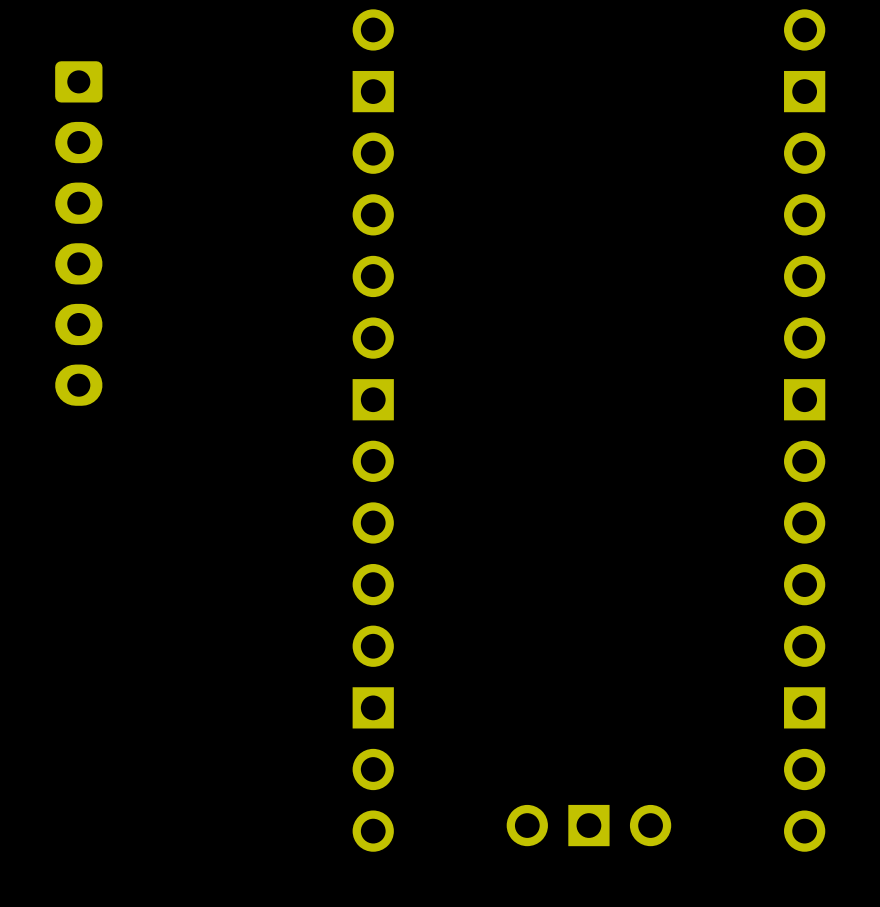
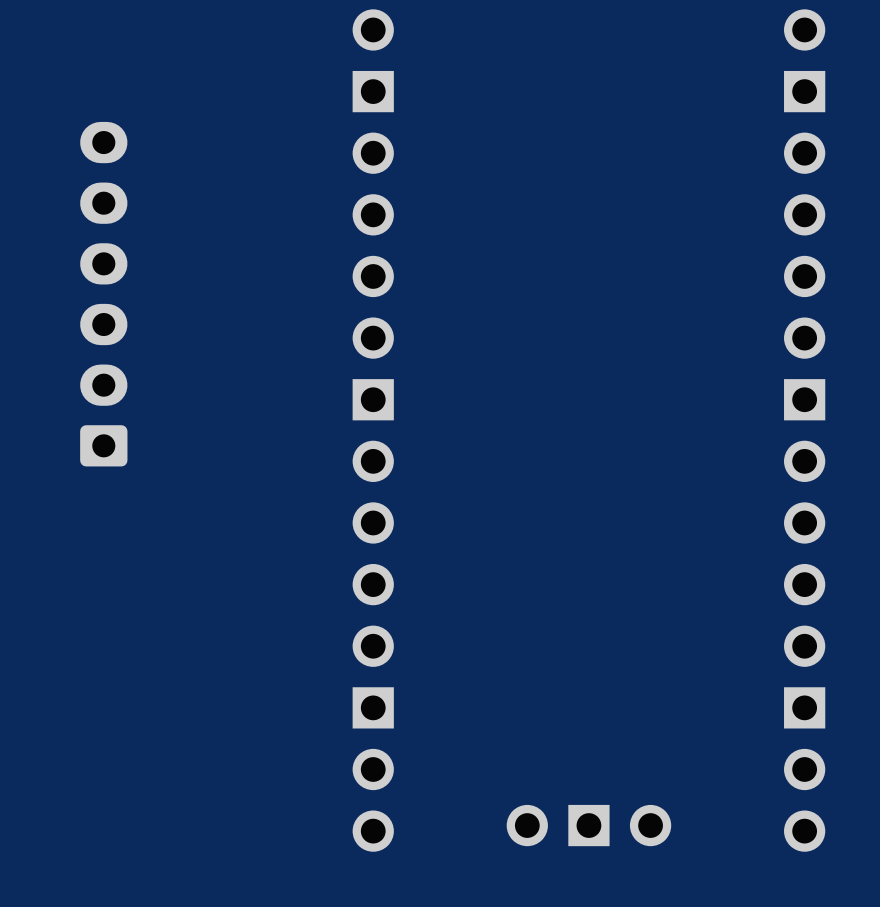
part rotation: 0° (78, 233) -> 180° (103, 294)

